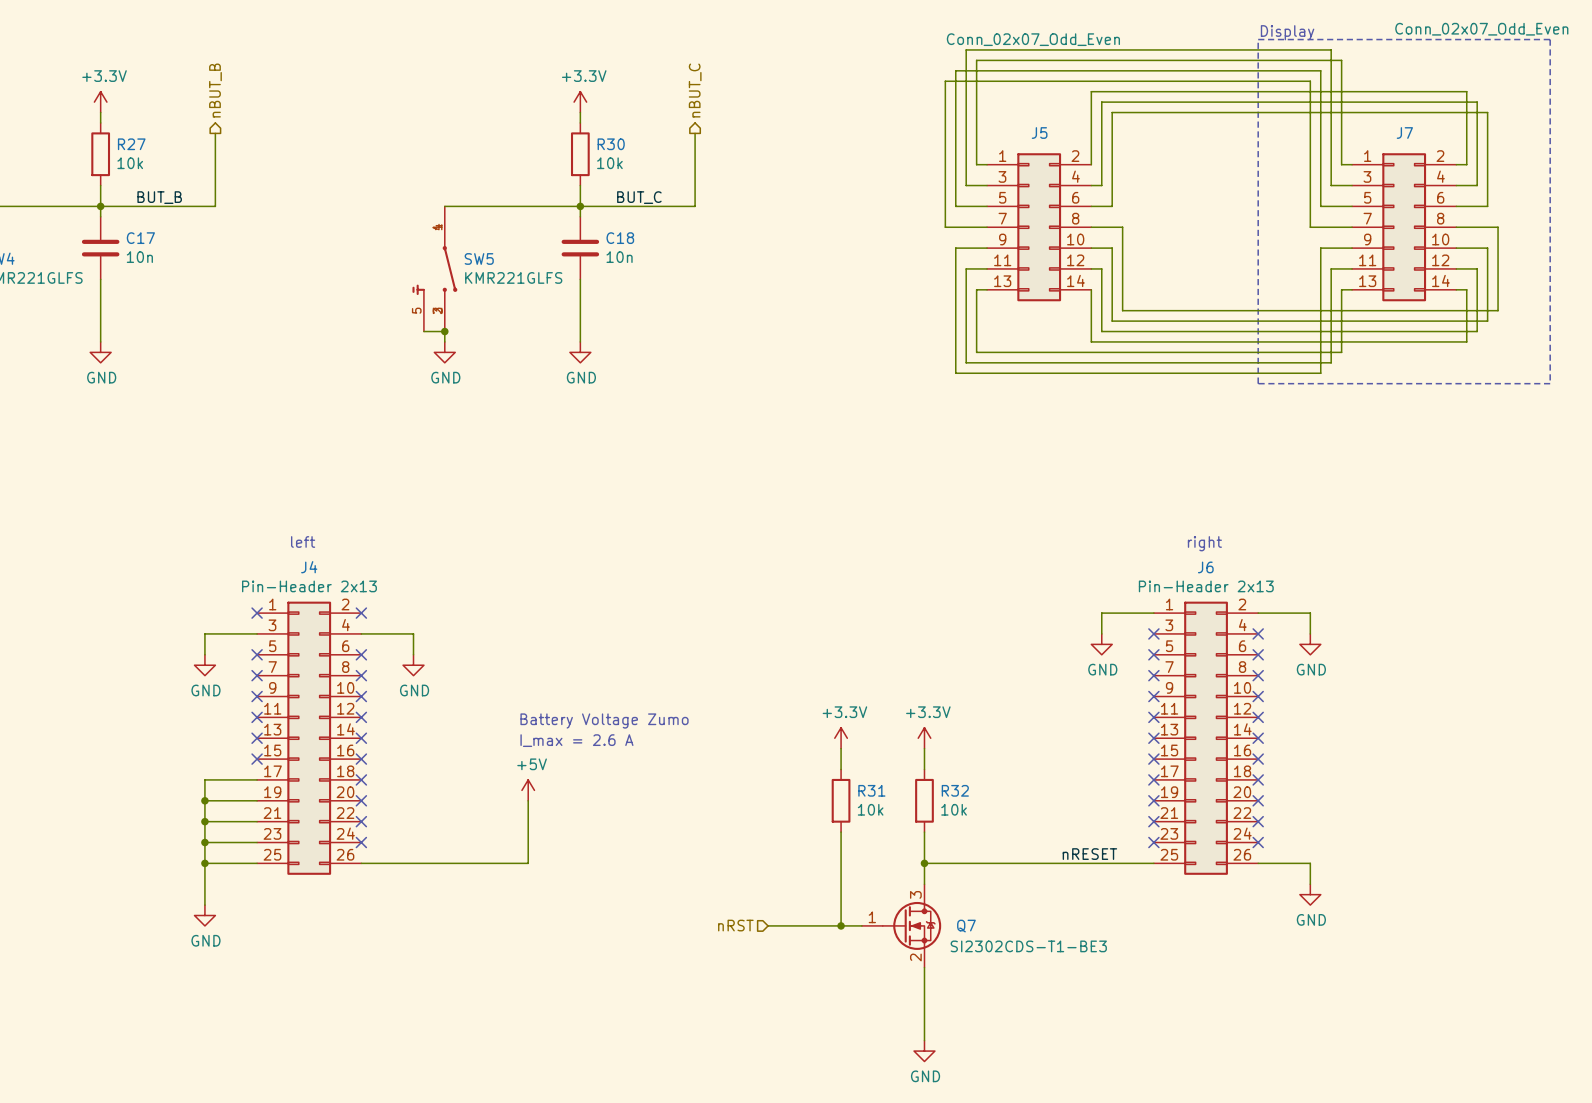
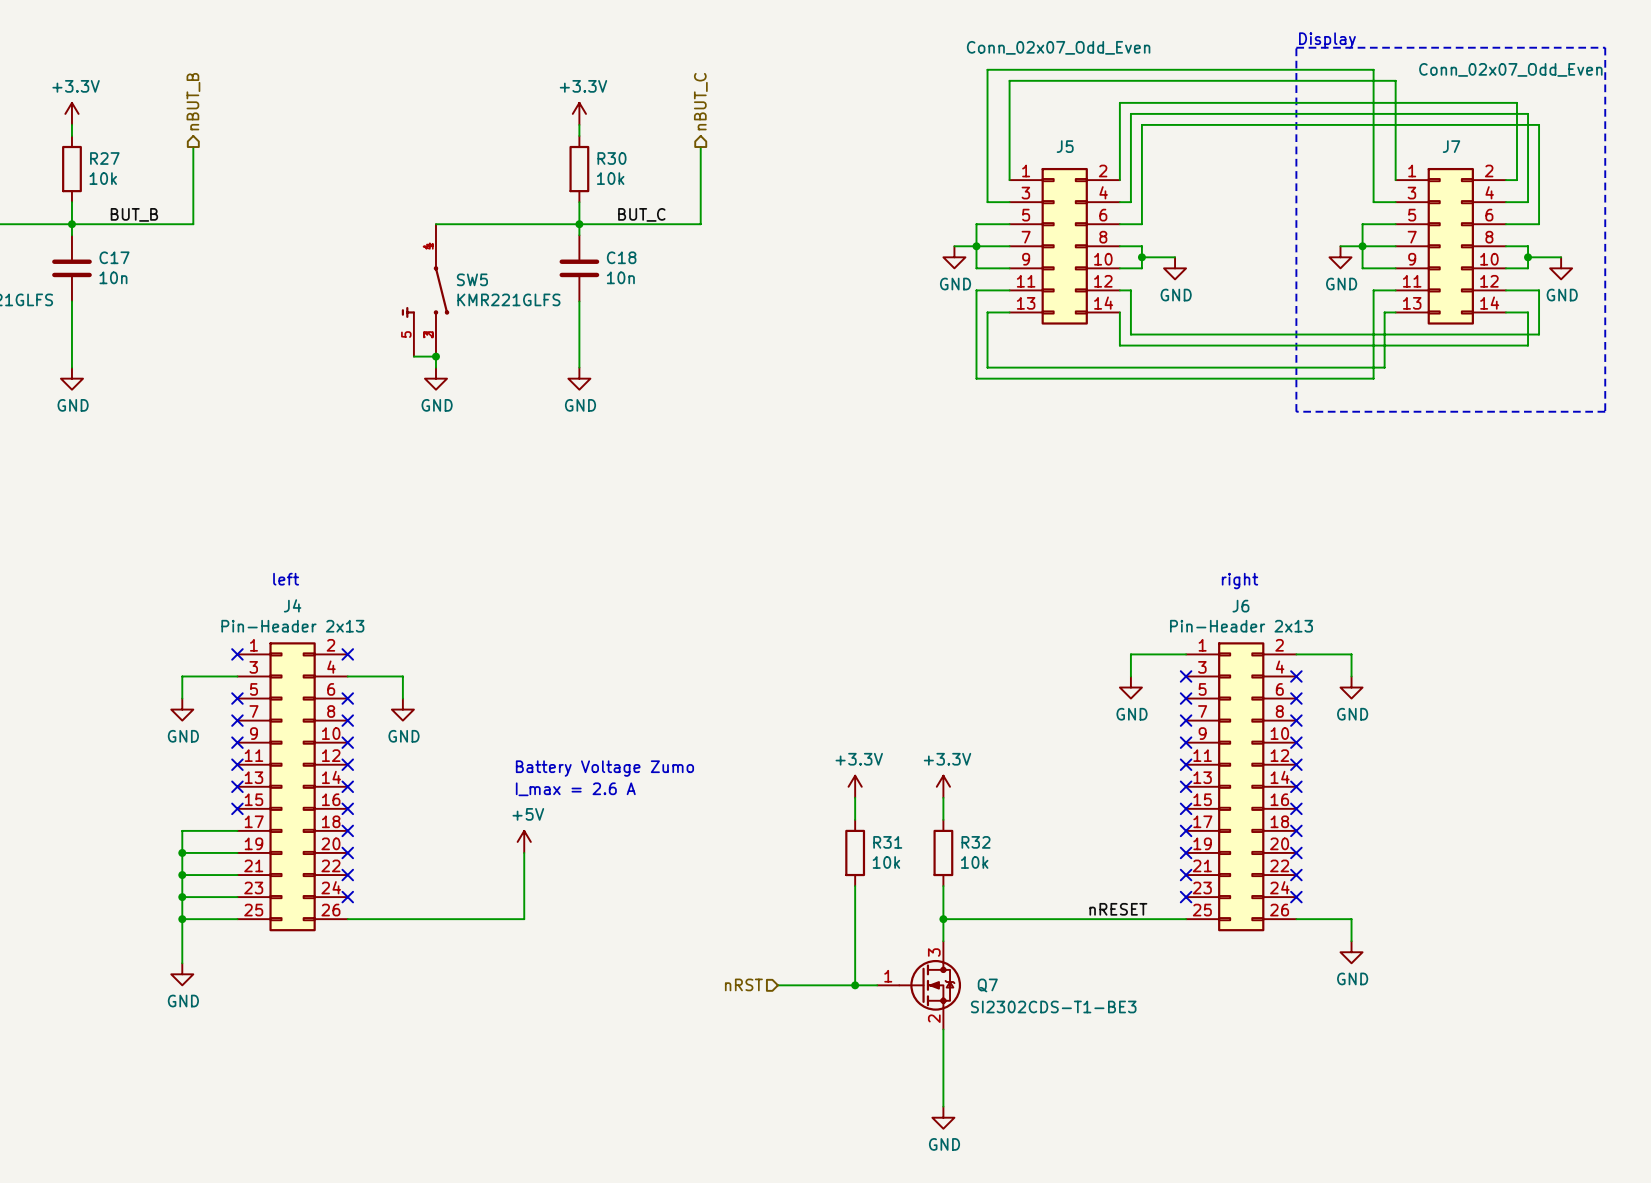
J7 value position: Conn_02x07_Odd_Even (1481, 29) -> Conn_02x07_Odd_Even (1510, 69)
wire: (966, 60) (966, 49) (1331, 49) (1331, 60) (1341, 60) (1341, 164) (1352, 164) -> (987, 69) (998, 69)
wire: (976, 60) (976, 164) (987, 164) -> (1009, 80) (1009, 180)
wire: (987, 70) (955, 70) (955, 206) -> (976, 268) (976, 224)
wire: (1320, 70) (1320, 206) -> (1362, 80) (1395, 80) (1395, 180)
wire: none -> (954, 246) (965, 246)
wire: (945, 227) (945, 81) (1310, 81) (1310, 227) -> (1340, 246) (1351, 246)
junction: none -> (976, 246)
wire: (1112, 227) (1122, 227) (1122, 310) -> (1141, 246) (1141, 268)
junction: none -> (1362, 246)
wire: (1477, 227) (1498, 227) (1498, 310) (1487, 310) (1487, 321) (1477, 321) (1477, 331) (1101, 331) (1101, 310) -> (1152, 334) (1130, 334)
wire: none -> (1528, 246) (1528, 268)
power symbol: none -> GND (954, 257)
wire: none -> (1141, 257) (1175, 257)
junction: none -> (1141, 257)
power symbol: none -> GND (1340, 257)
wire: none -> (1528, 257) (1561, 257)
junction: none -> (1528, 257)
wire: (955, 248) (955, 268) -> (987, 290) (976, 290)
wire: (1112, 248) (1112, 321) -> none
power symbol: none -> GND (1175, 268)
wire: (1320, 248) (1320, 373) (955, 373) (955, 352) -> (1362, 268) (1362, 224)
wire: (1477, 248) (1487, 248) (1487, 268) -> (1528, 290) (1539, 290)
power symbol: none -> GND (1561, 268)
wire: (966, 268) (966, 289) -> (998, 312) (987, 312)
wire: (1477, 268) (1477, 289) -> (1516, 312) (1528, 312)
wire: (976, 289) (976, 352) -> (976, 378) (998, 378)
wire: (1466, 289) (1466, 341) (1341, 341) (1341, 352) (1331, 352) (1331, 362) (966, 362) (966, 341) -> (1119, 367) (987, 367)
wire: (1091, 321) (1091, 341) -> (1119, 345) (1141, 345)

